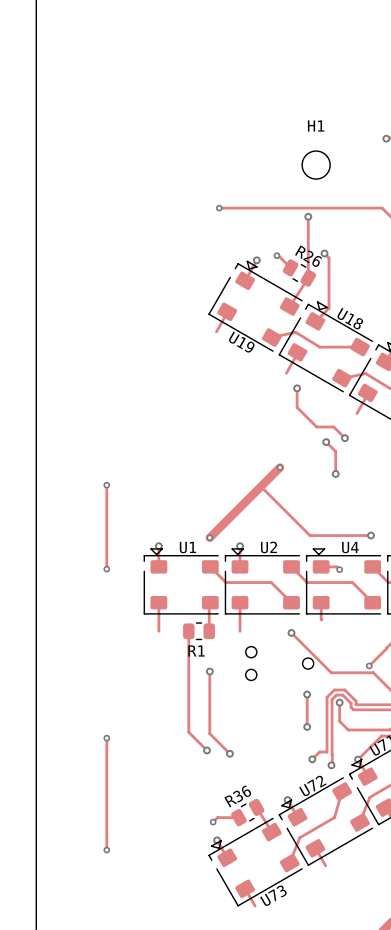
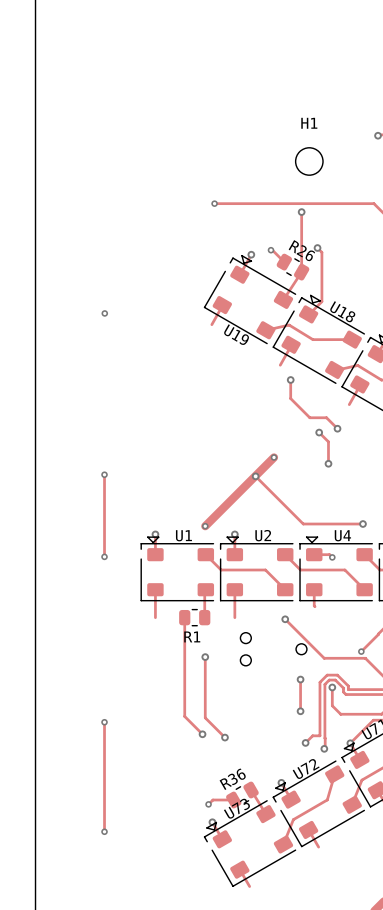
via: none -> (104, 313)
via: none -> (255, 476)
U73 name position: U73 (273, 895) -> U73 (237, 808)

